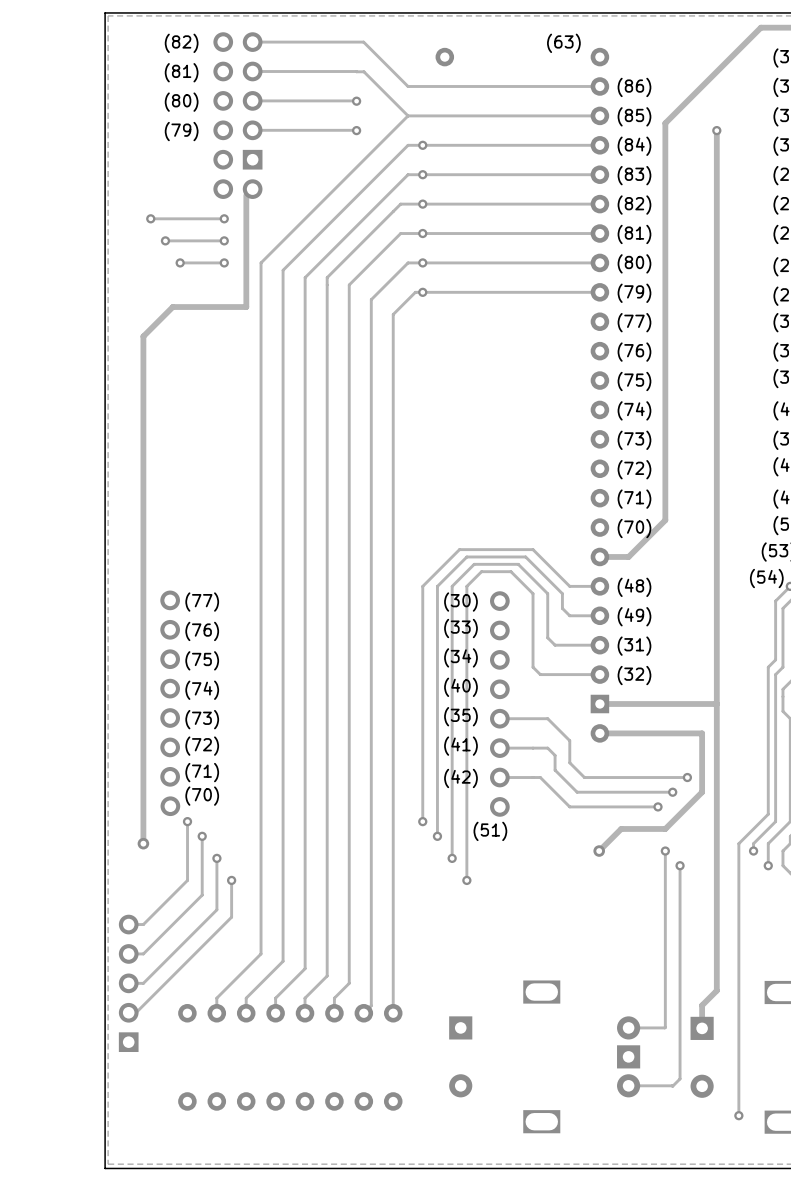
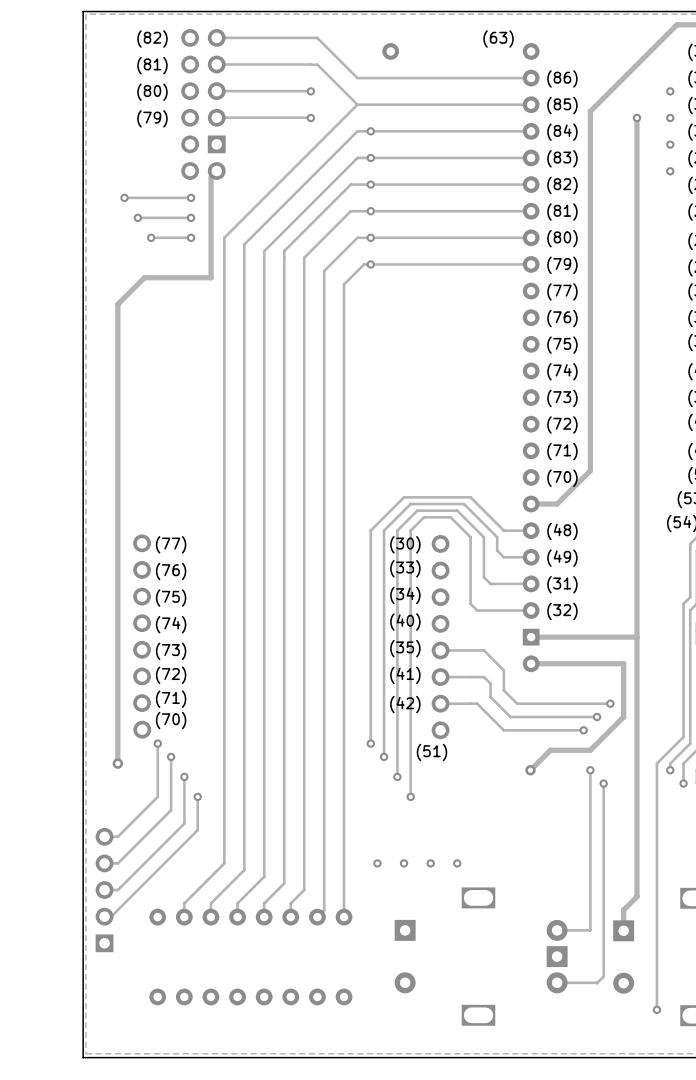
via: none -> (670, 91)
via: none -> (670, 118)
via: none -> (670, 144)
via: none -> (670, 171)
via: none -> (377, 863)
via: none -> (404, 863)
via: none -> (430, 863)
via: none -> (457, 863)

